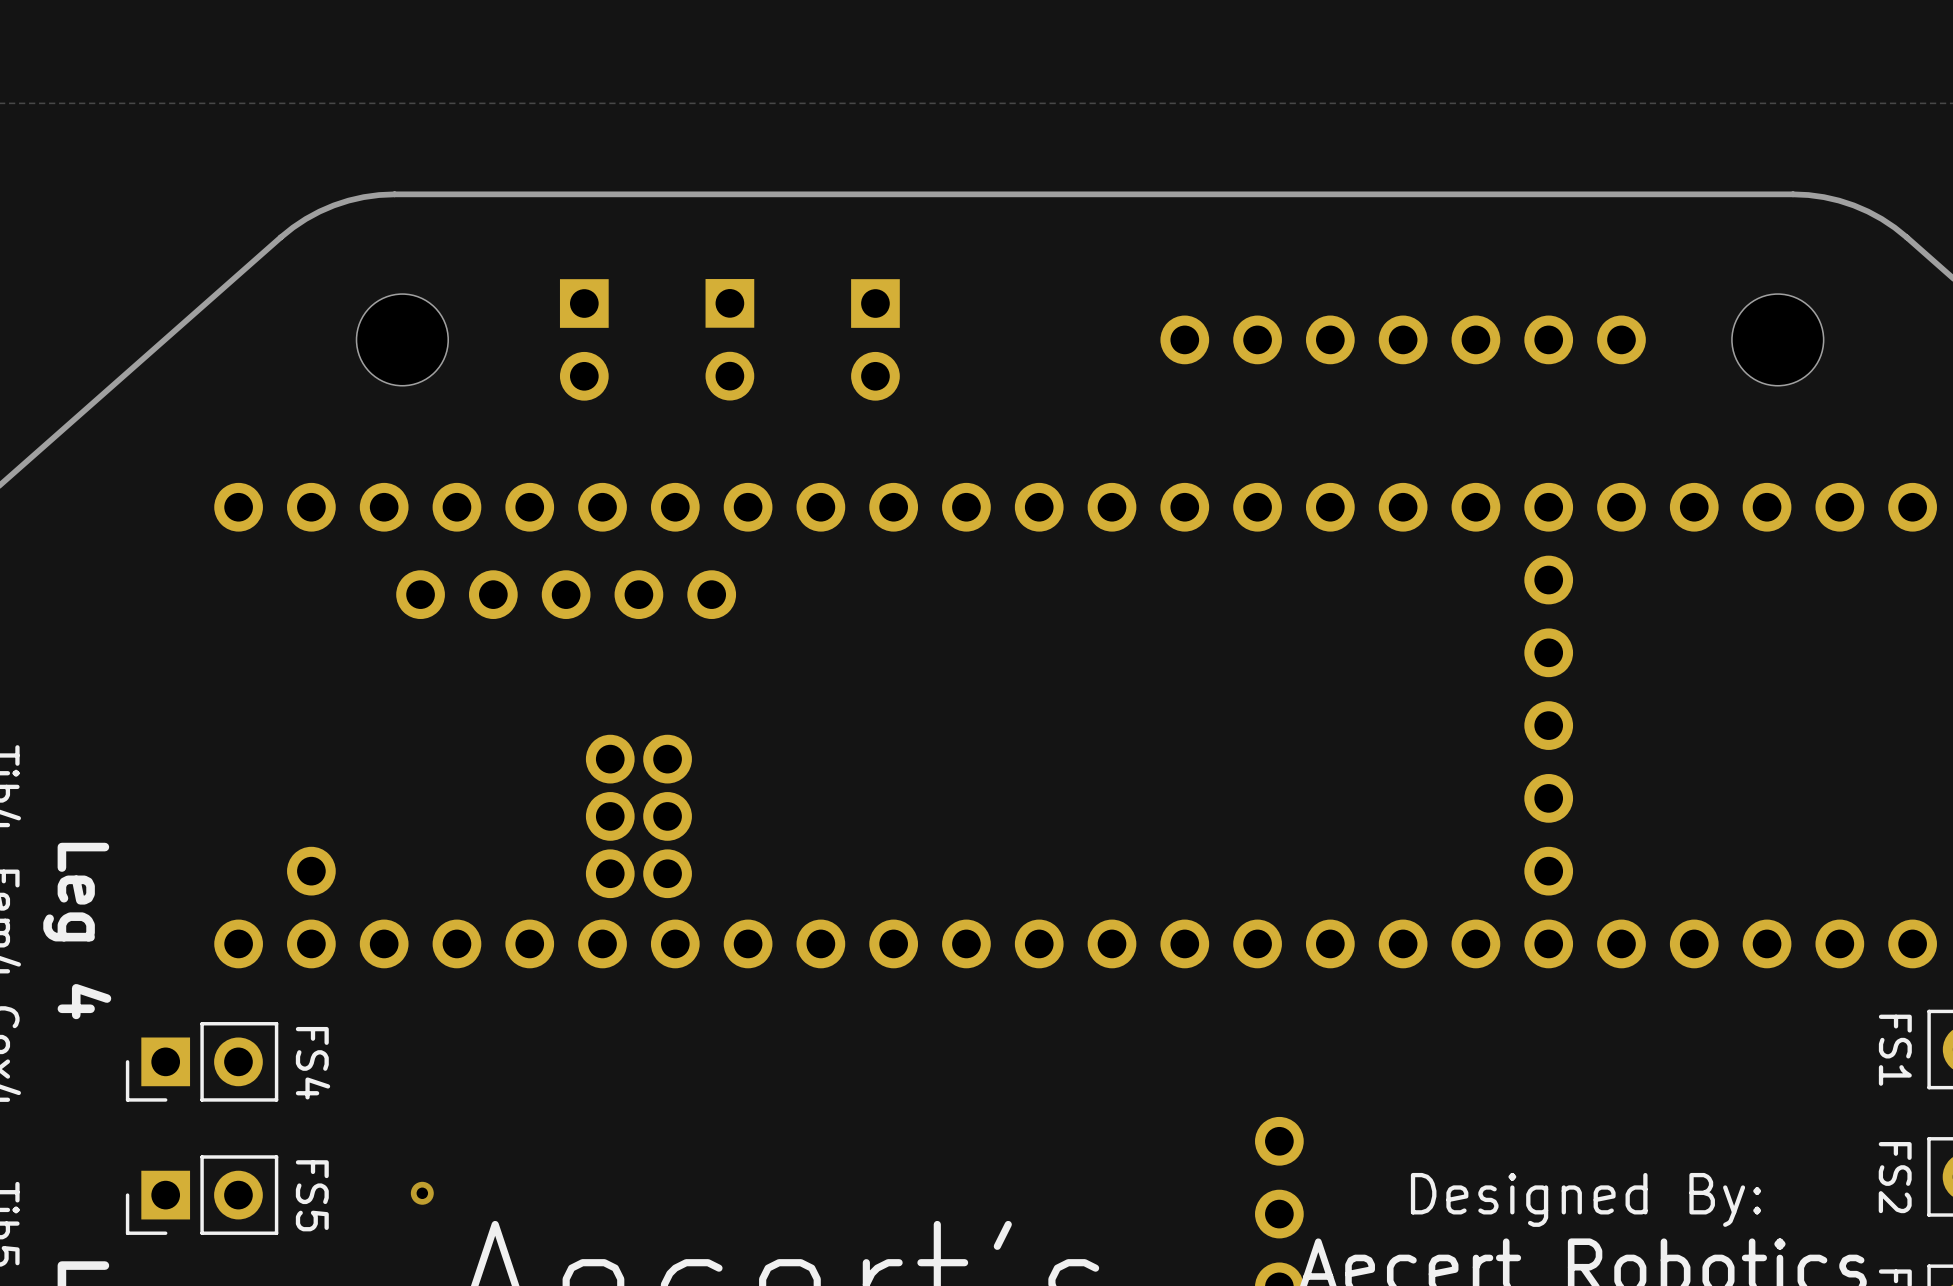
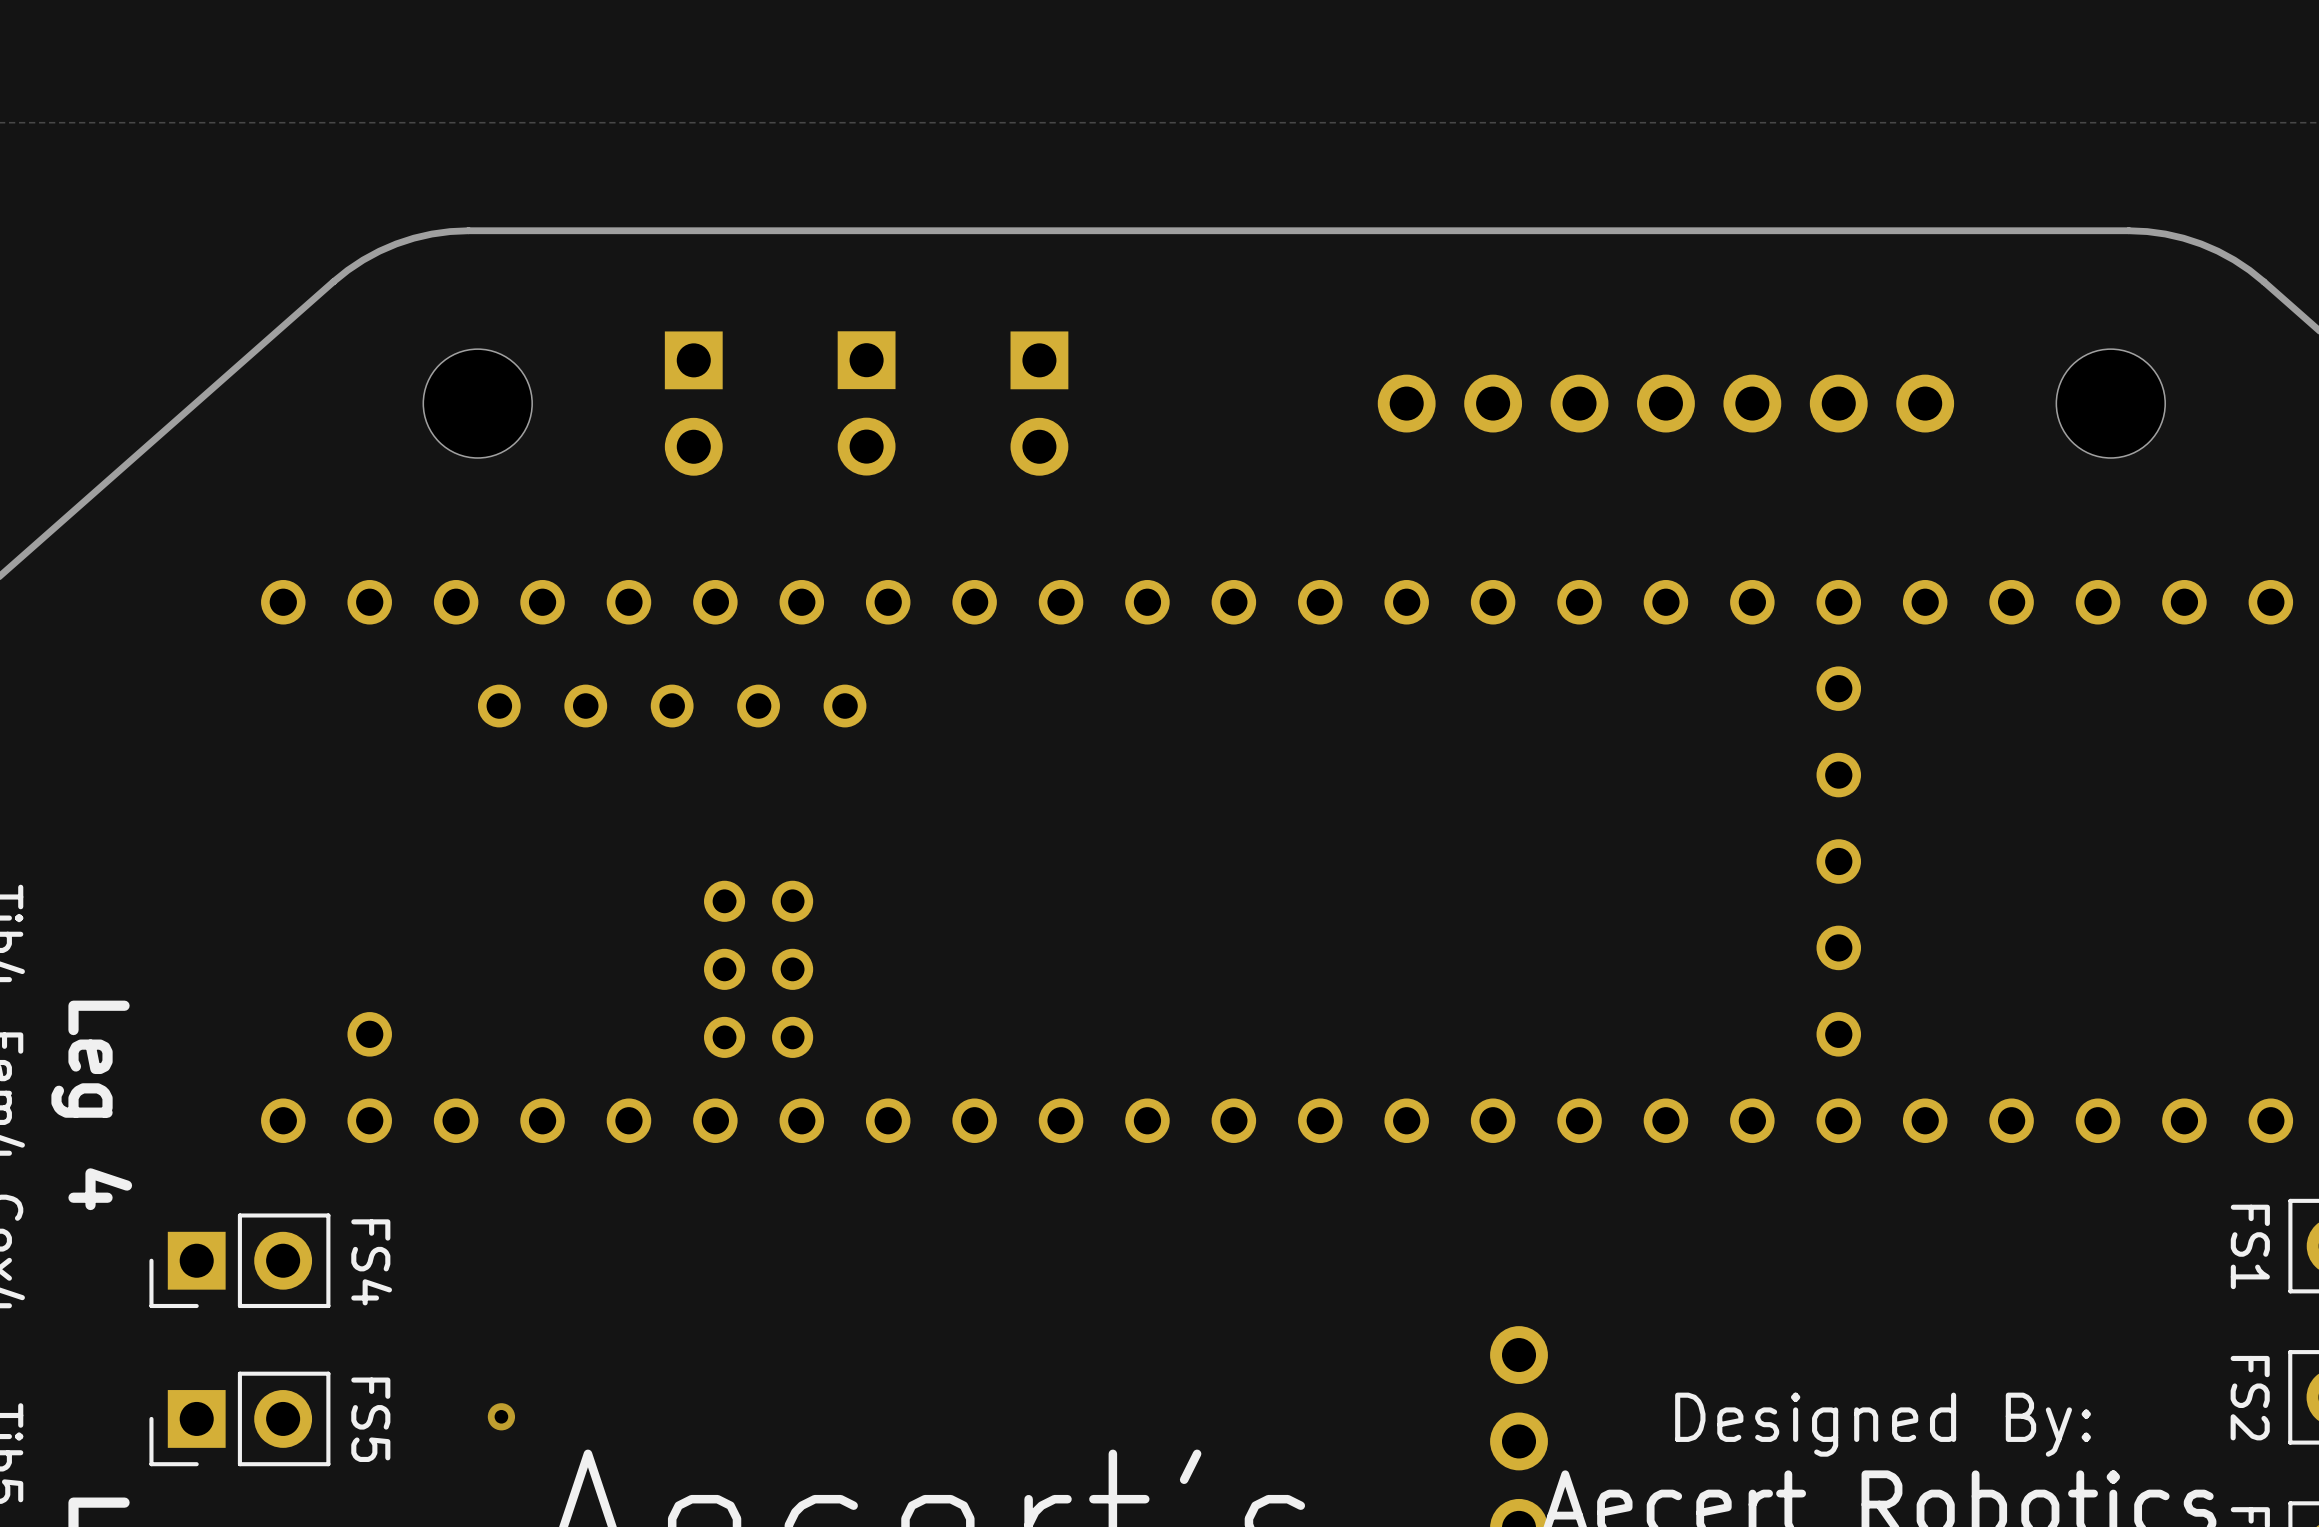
part footprint: [214, 482, 1937, 969] -> [261, 580, 2294, 1143]

